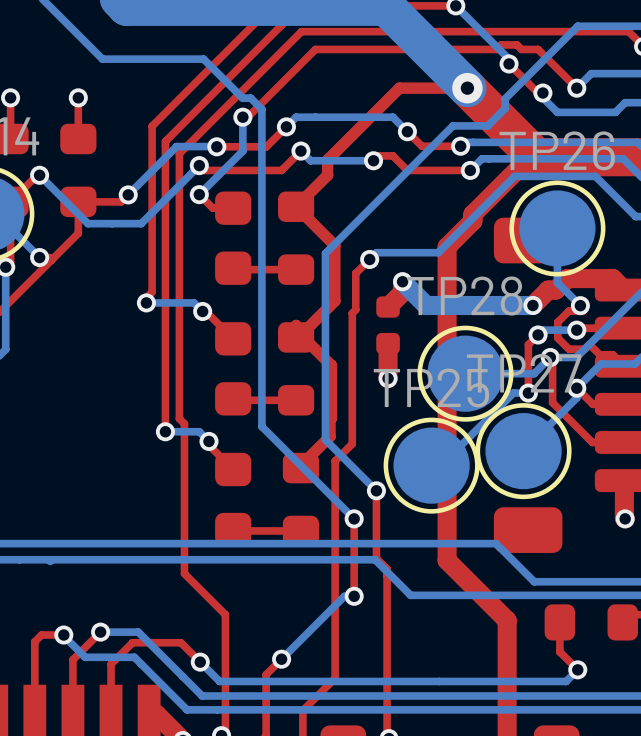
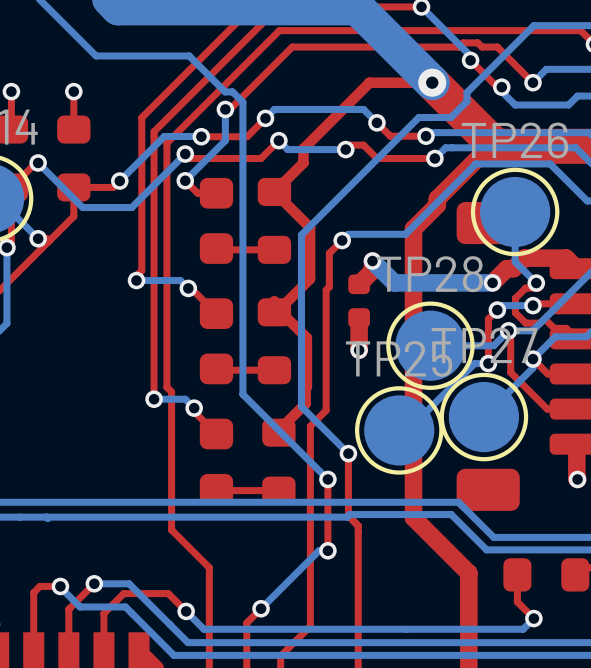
bottom track: (375, 559) (410, 595) (526, 595) -> (347, 517) (349, 514) (451, 514) (486, 549)

